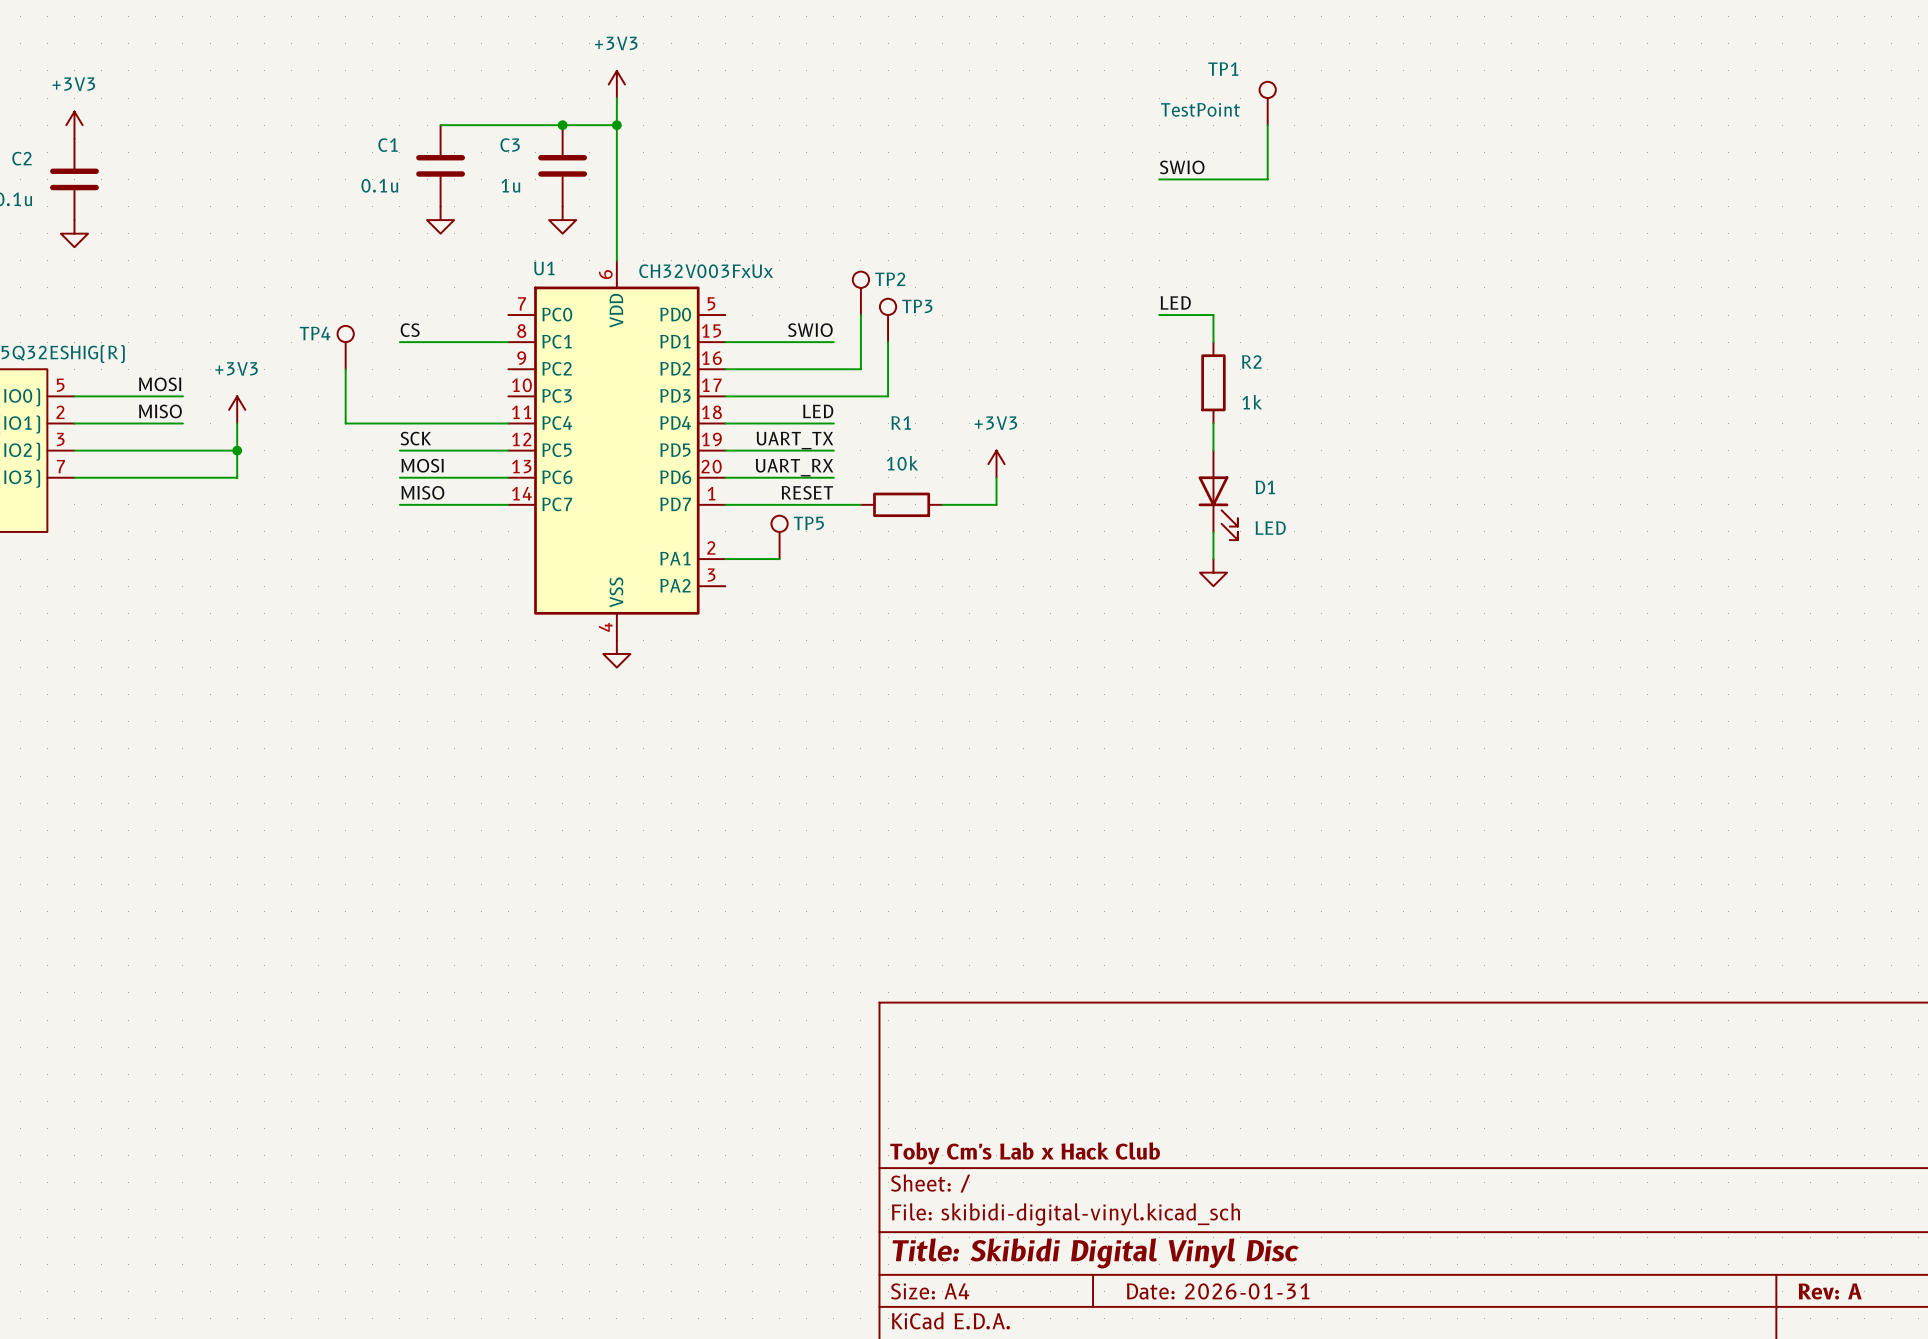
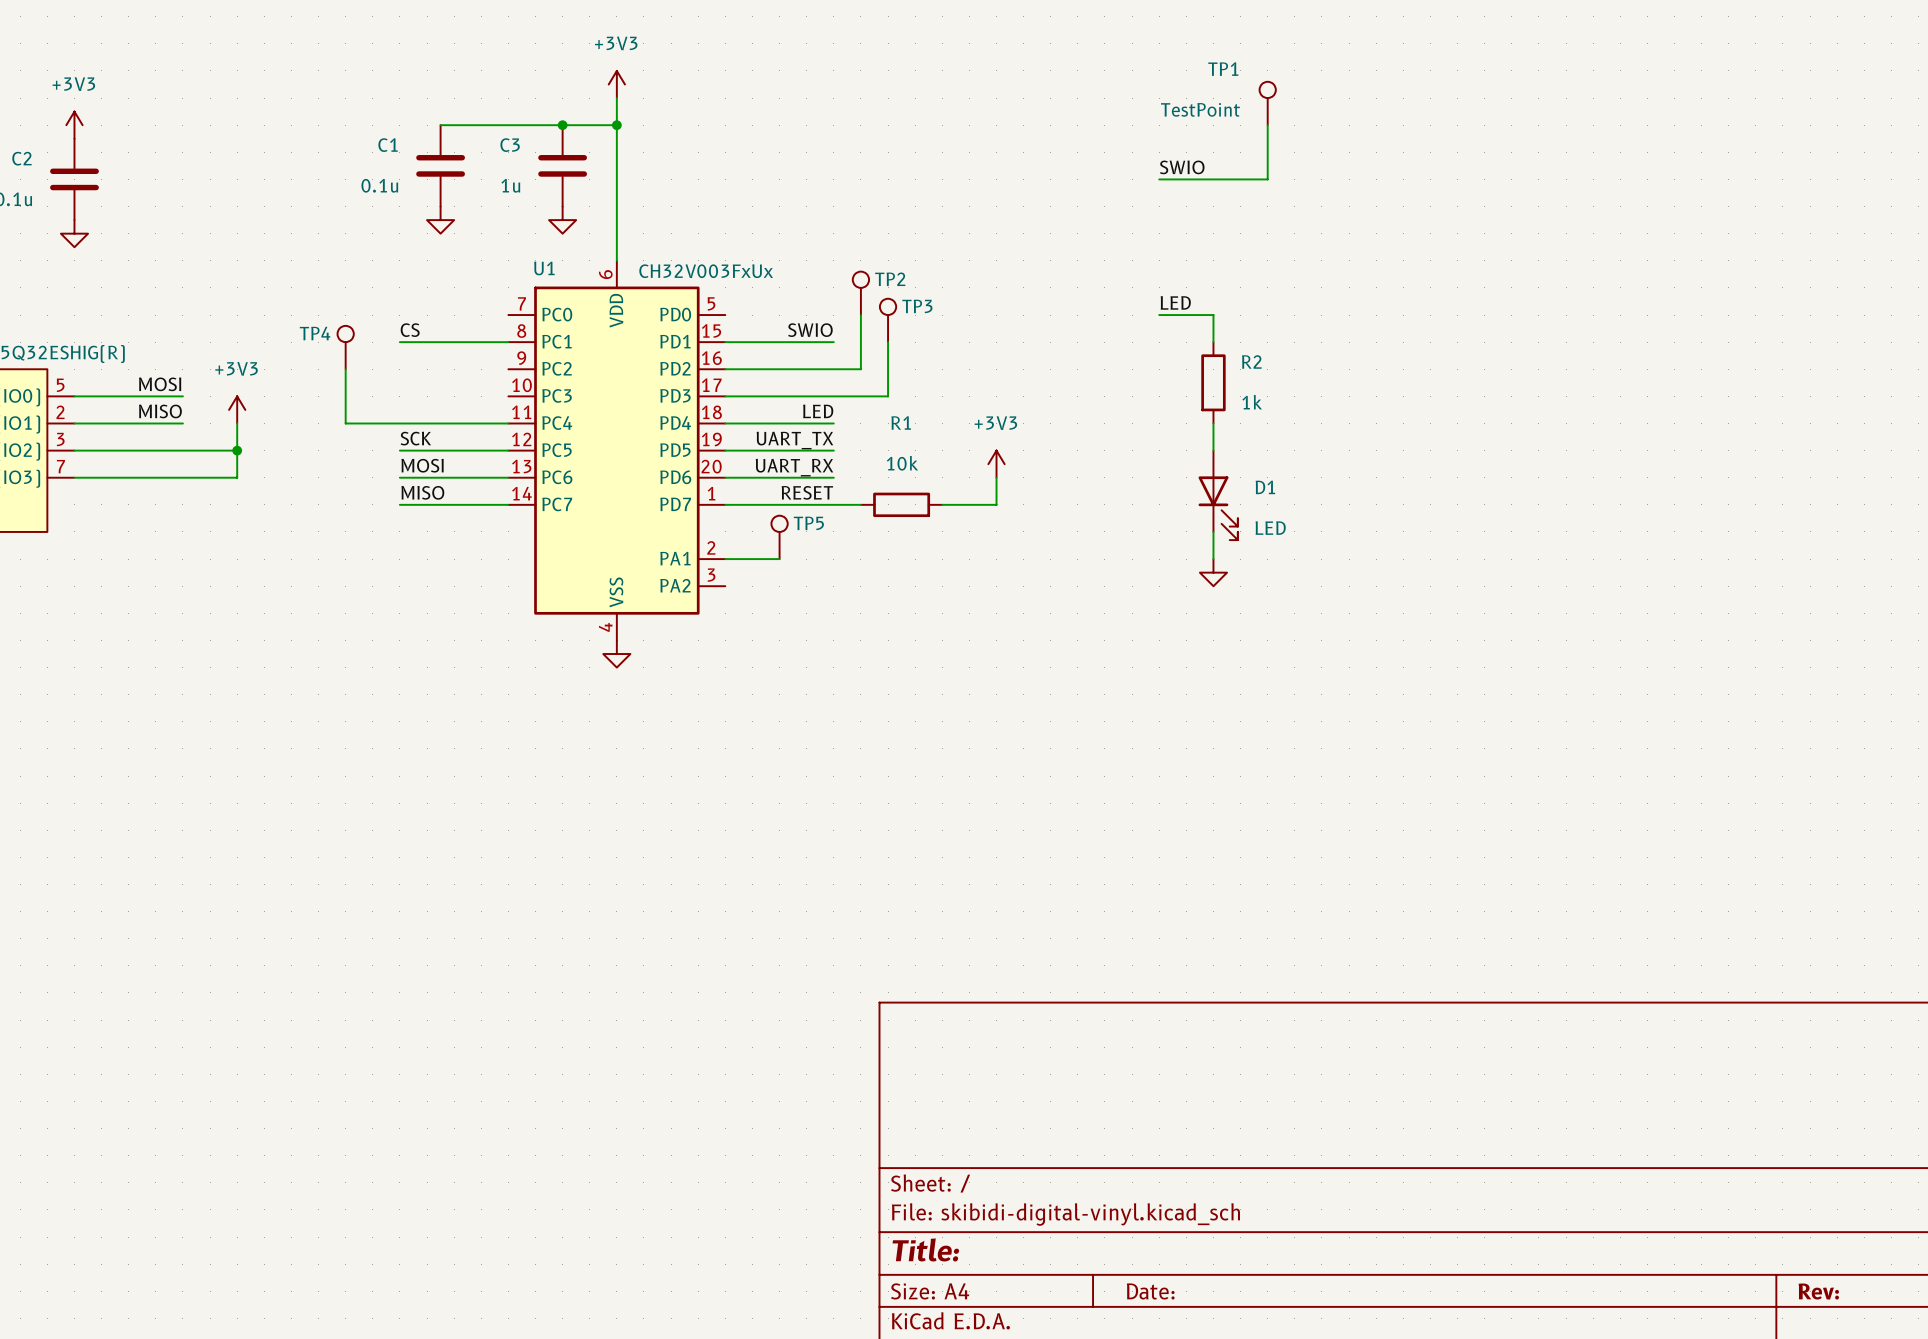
title block: Toby Cm's Lab x Hack Club (1025, 1153) -> none
title block: Title: Skibidi Digital Vinyl Disc (1095, 1253) -> Title: (925, 1249)
title block: Date: 2026-01-31 (1218, 1291) -> Date: (1150, 1291)
title block: Rev: A (1830, 1291) -> Rev: (1818, 1291)

